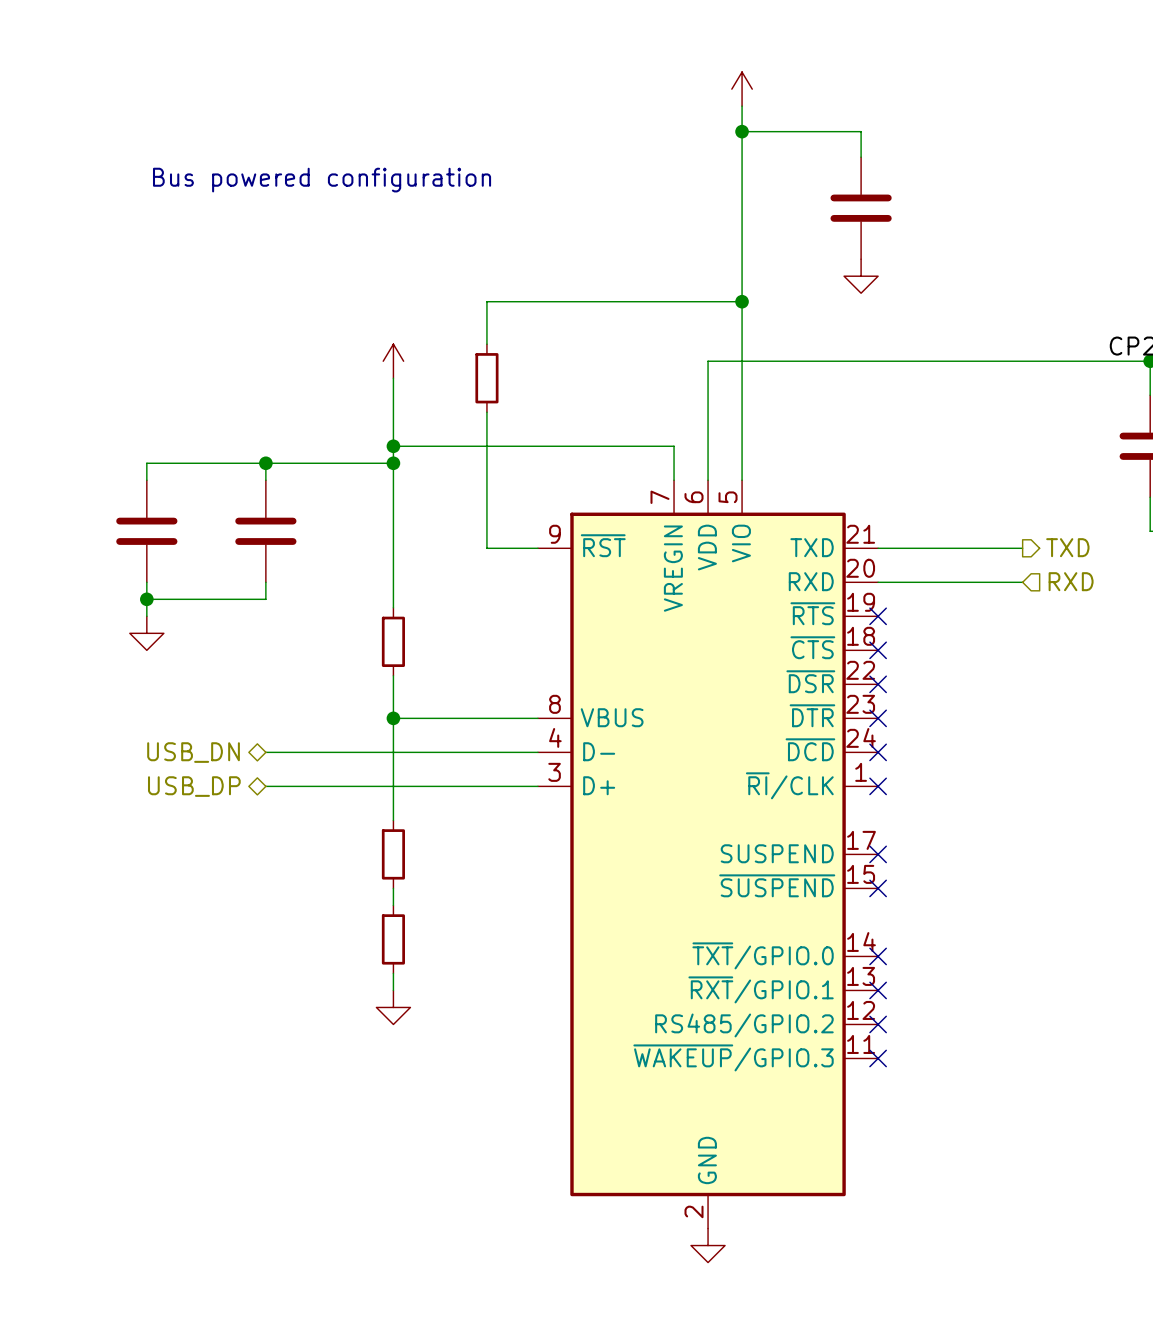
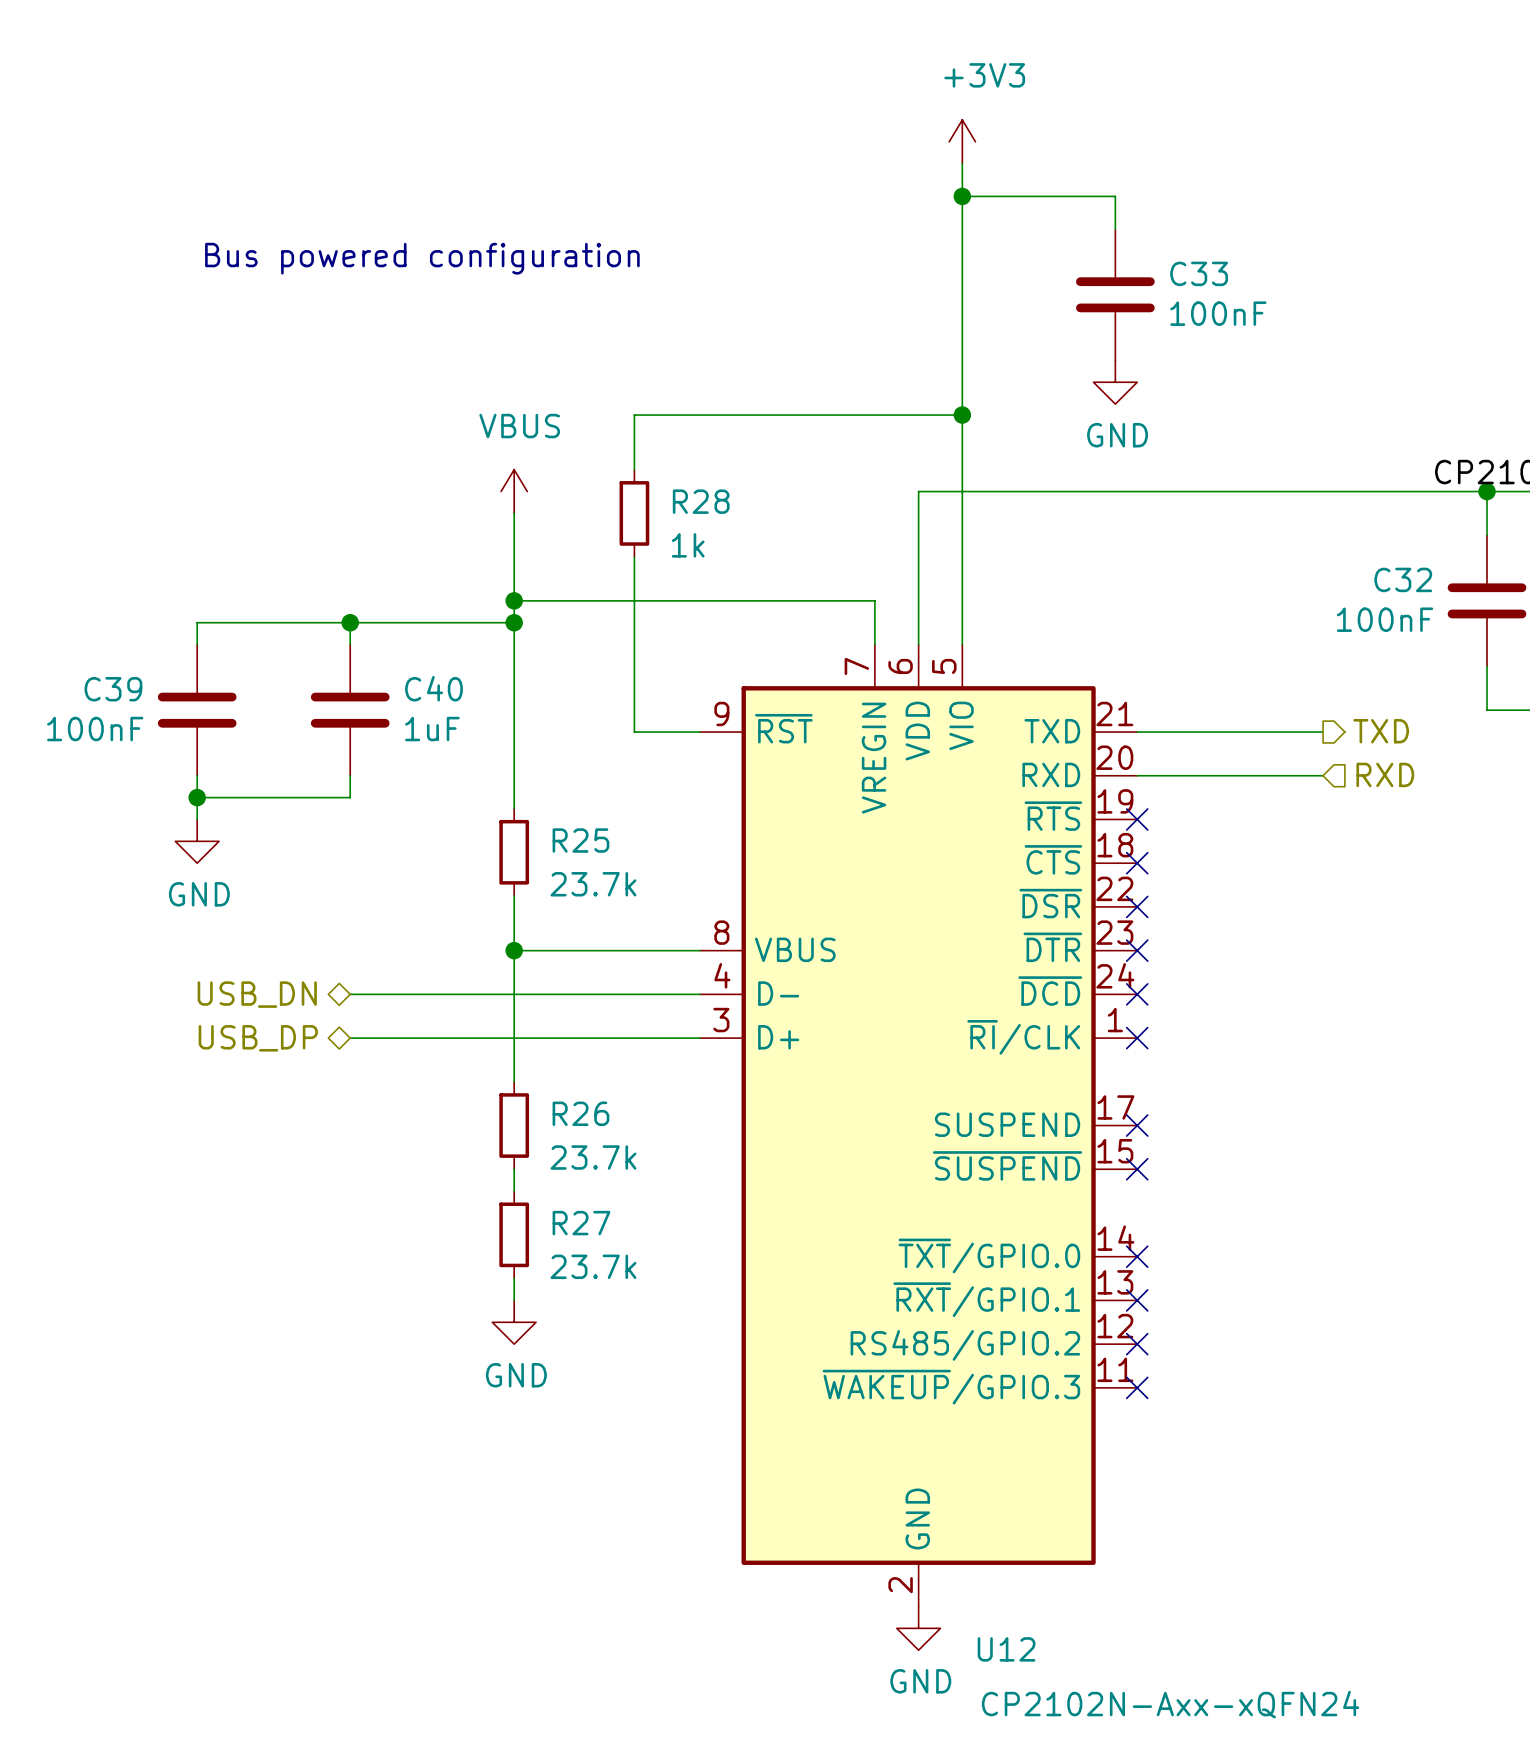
power symbol text: none -> +3V3 (984, 75)
C33 name: none -> C33 (1199, 273)
C33 value: none -> 100nF (1218, 313)
power symbol text: none -> VBUS (519, 426)
power symbol text: none -> GND (1117, 435)
R28 name: none -> R28 (701, 501)
R28 value: none -> 1k (688, 545)
C32 name: none -> C32 (1403, 579)
C32 value: none -> 100nF (1385, 619)
C40 name: none -> C40 (433, 688)
C39 name: none -> C39 (113, 689)
C39 value: none -> 100nF (95, 729)
C40 value: none -> 1uF (432, 729)
R25 name: none -> R25 (580, 840)
R25 value: none -> 23.7k (593, 884)
power symbol text: none -> GND (199, 894)
R26 name: none -> R26 (580, 1113)
R26 value: none -> 23.7k (593, 1157)
R27 name: none -> R27 (581, 1223)
R27 value: none -> 23.7k (593, 1266)
power symbol text: none -> GND (516, 1375)
U12 name: none -> U12 (1006, 1649)
power symbol text: none -> GND (920, 1681)
U12 value: none -> CP2102N-Axx-xQFN24 (1170, 1704)

